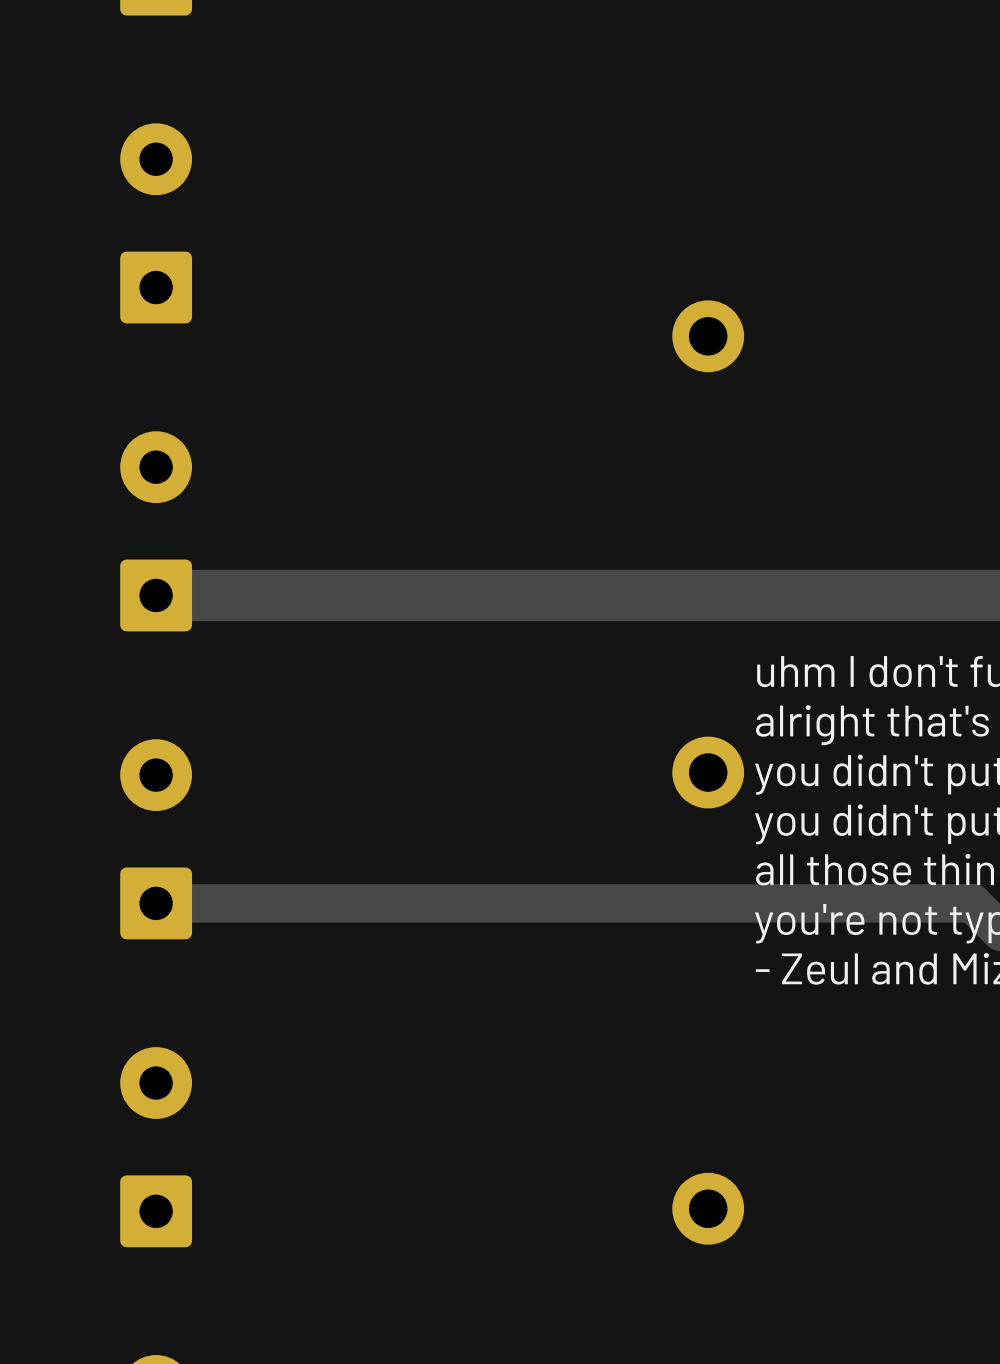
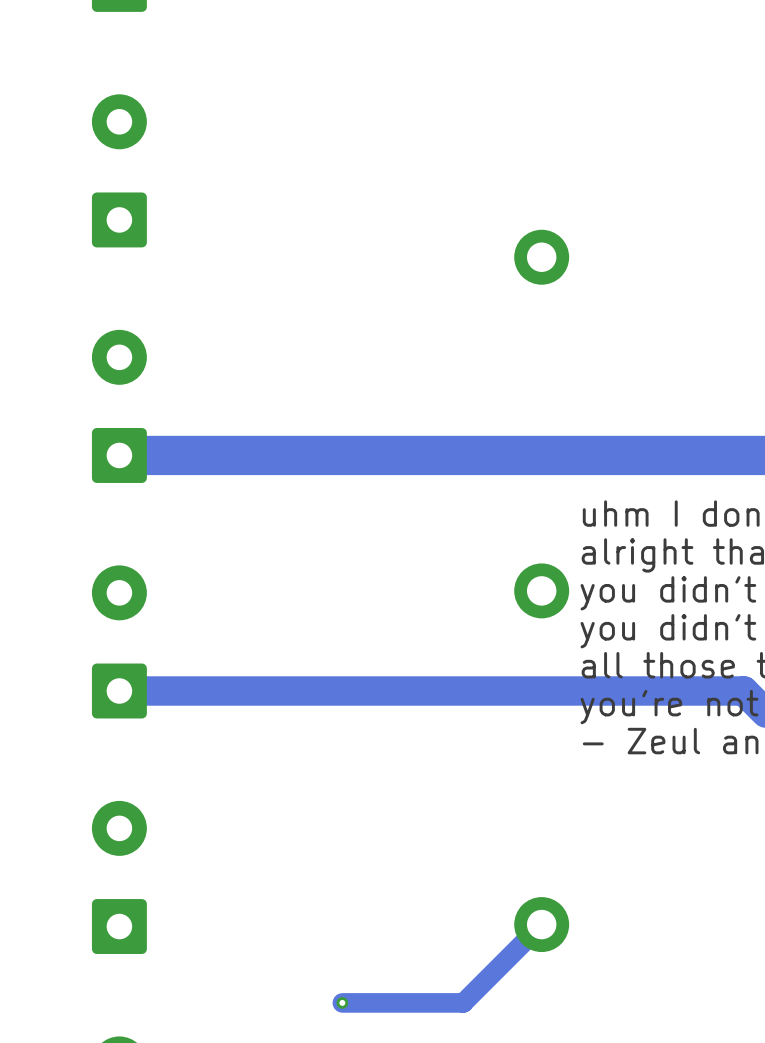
track: none -> (541, 924) (463, 1002) (342, 1002)
via: none -> (342, 1002)

